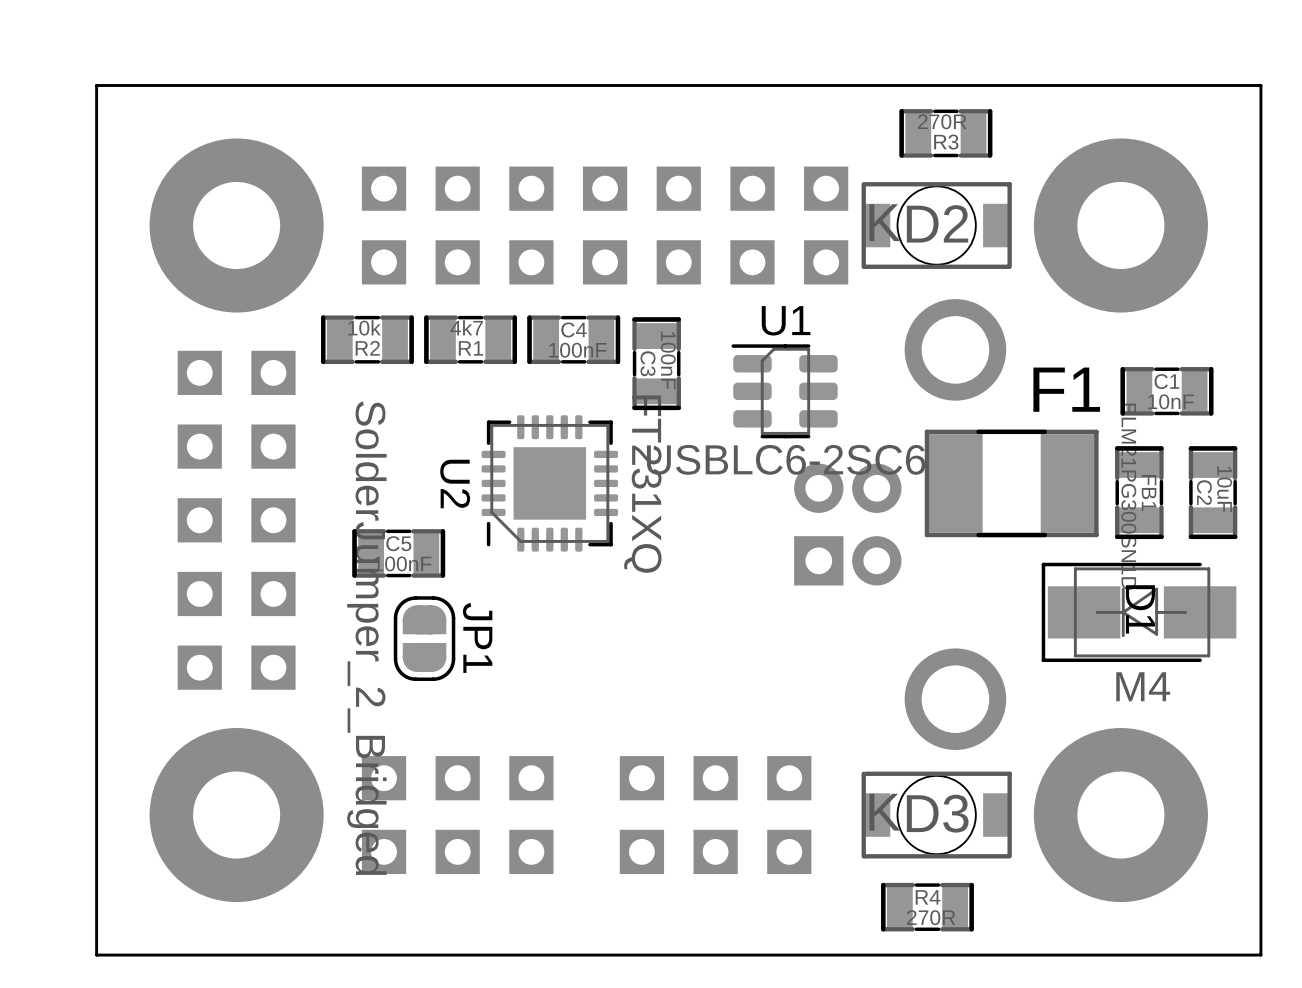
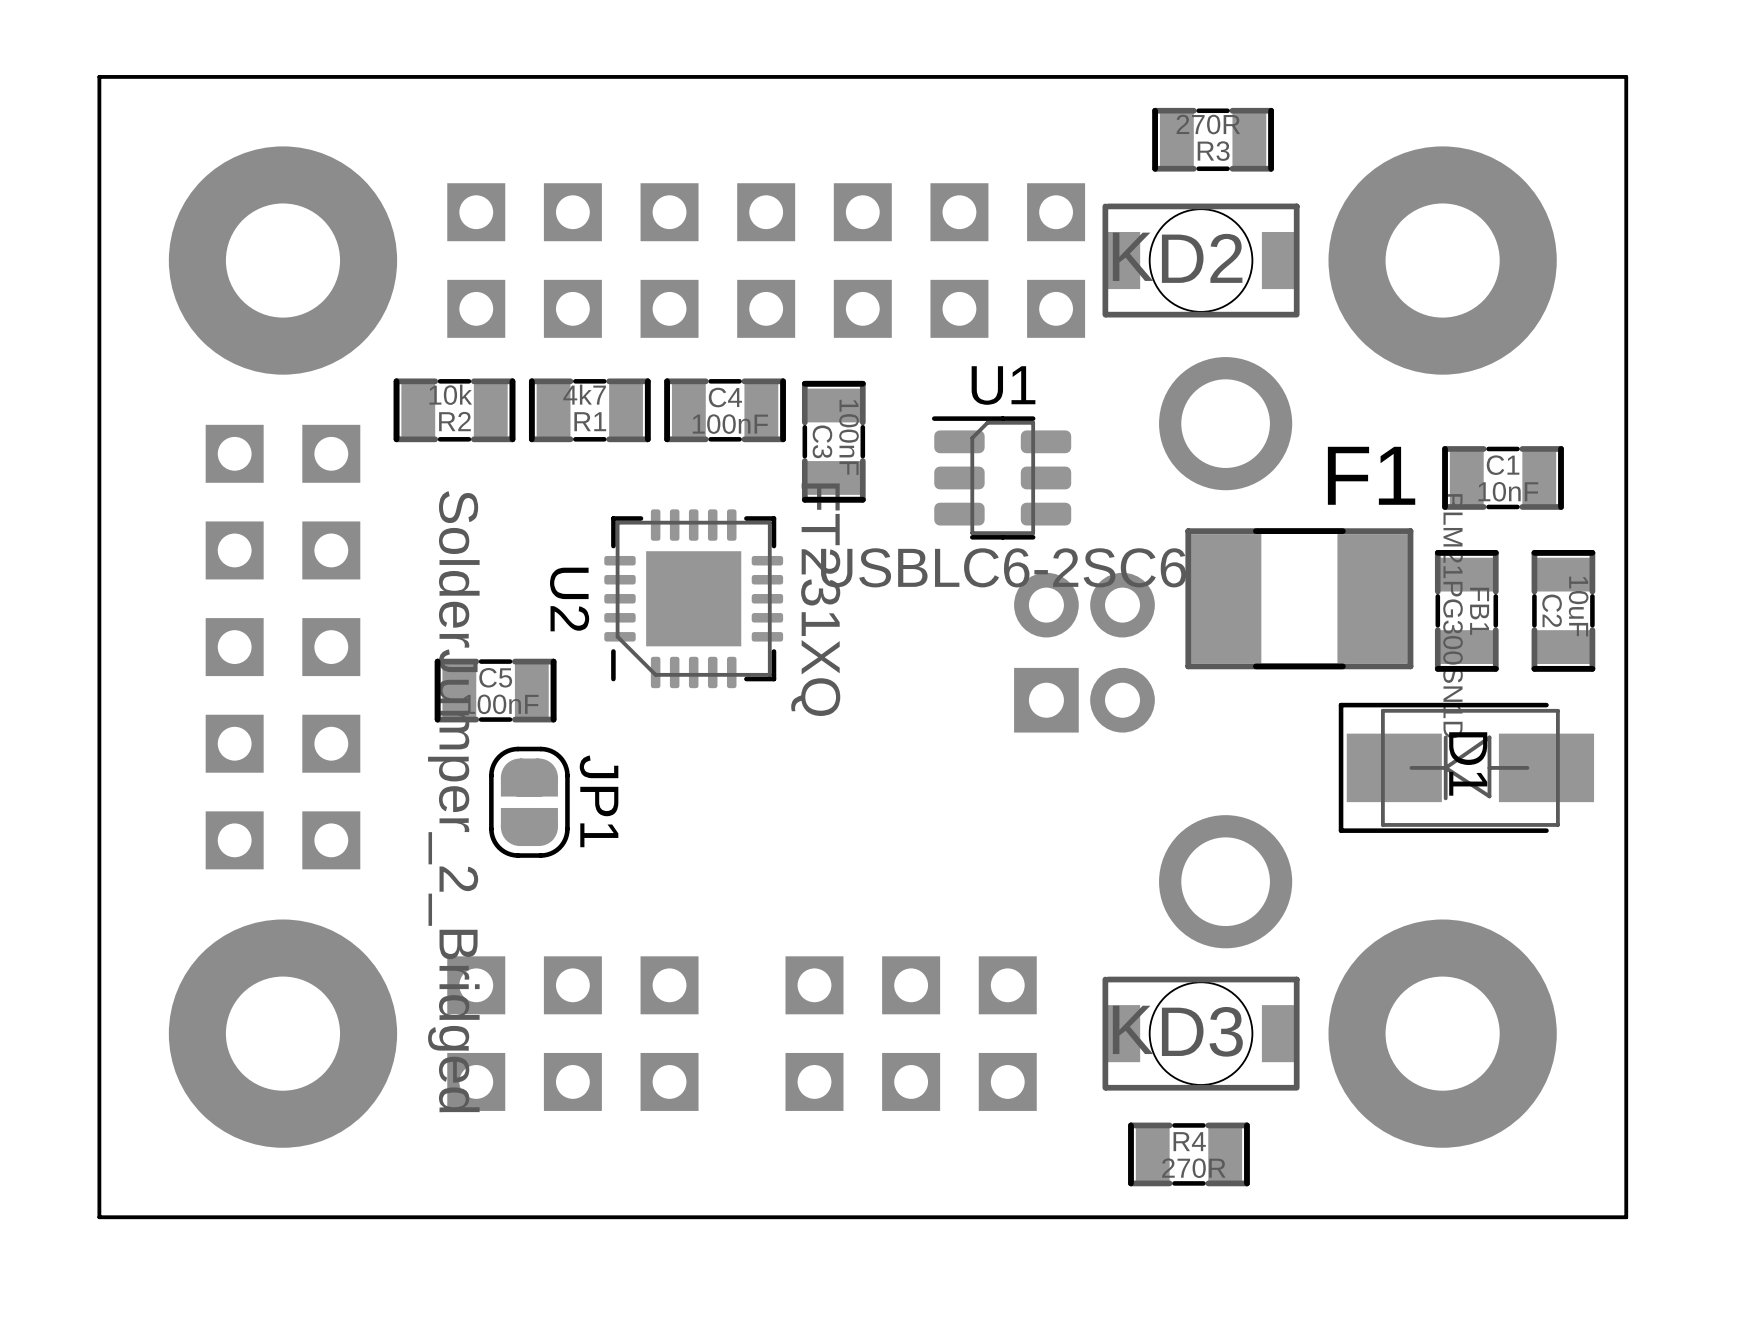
D1 value: M4 (1143, 686) -> none

